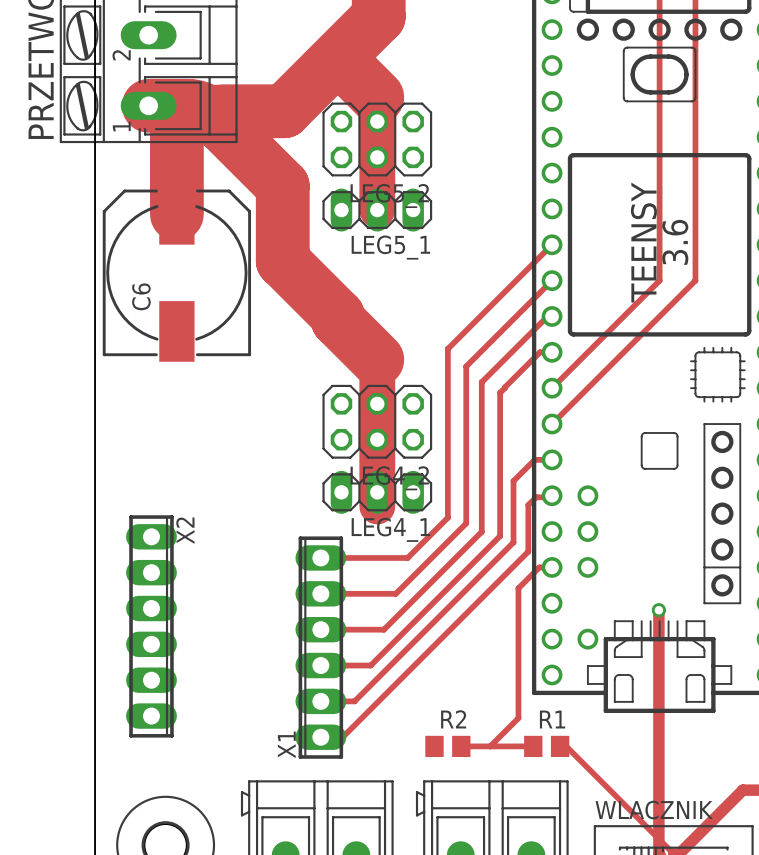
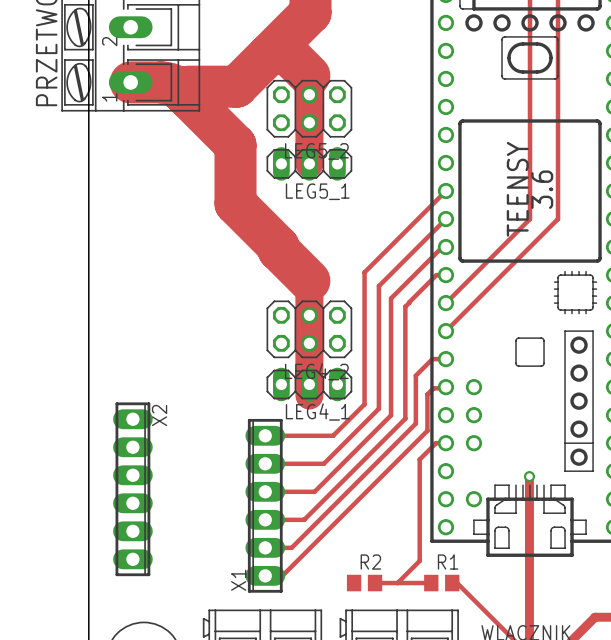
track: (165, 105) (176, 117) (176, 214) -> none
C6: (176, 272) -> none

